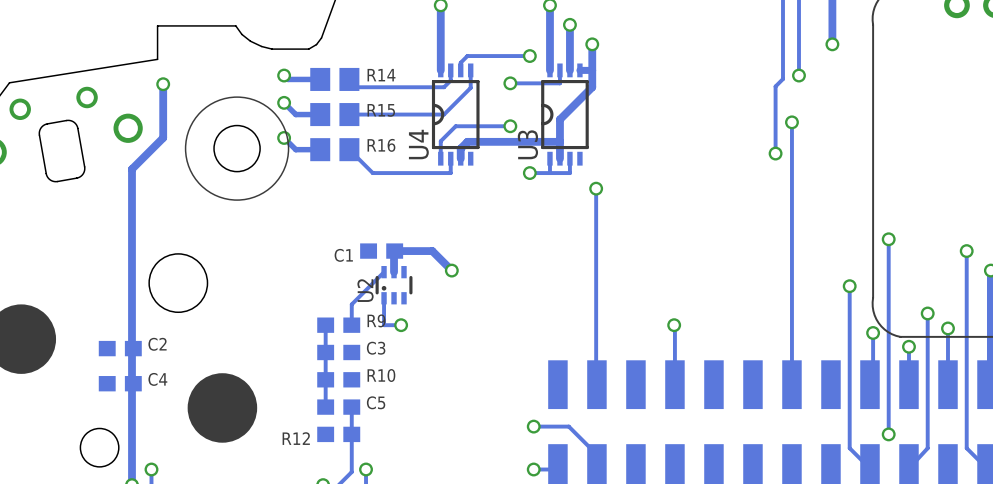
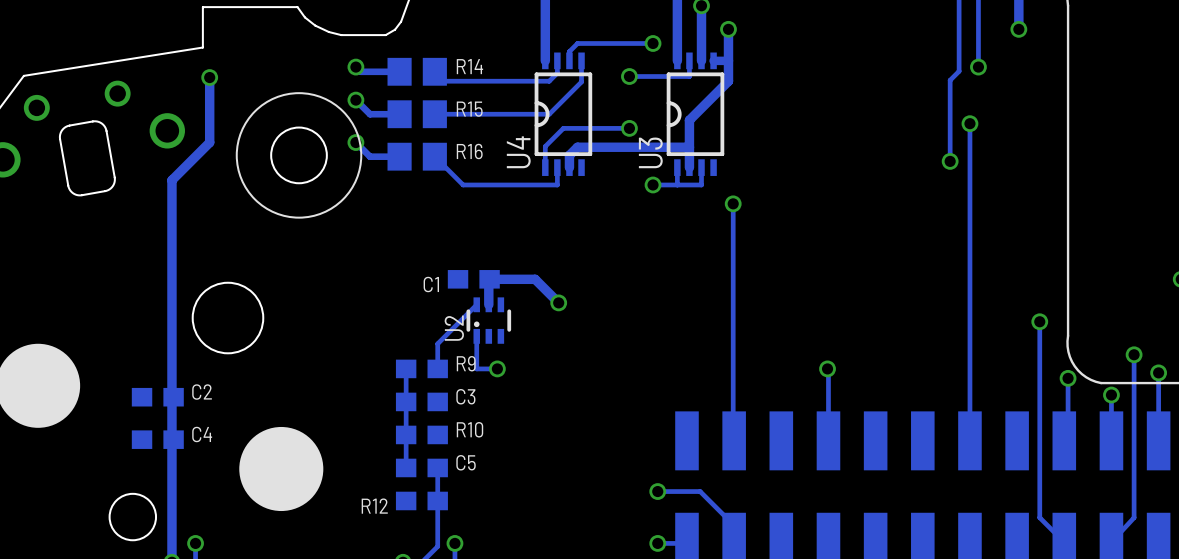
track: (888, 239) (888, 434) -> none
via: (888, 239) -> none
via: (888, 434) -> none

